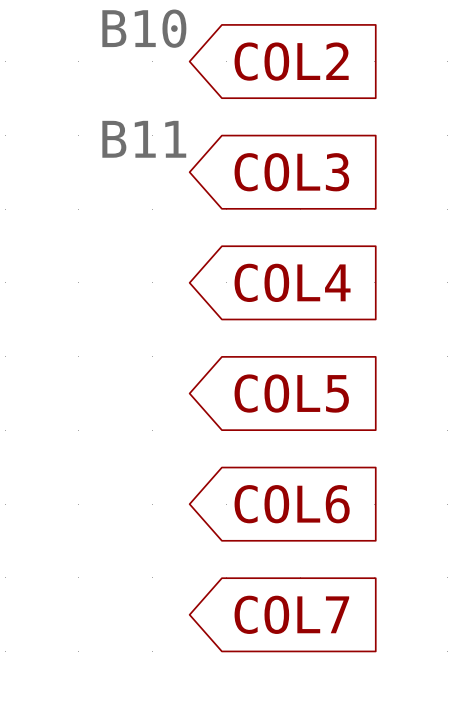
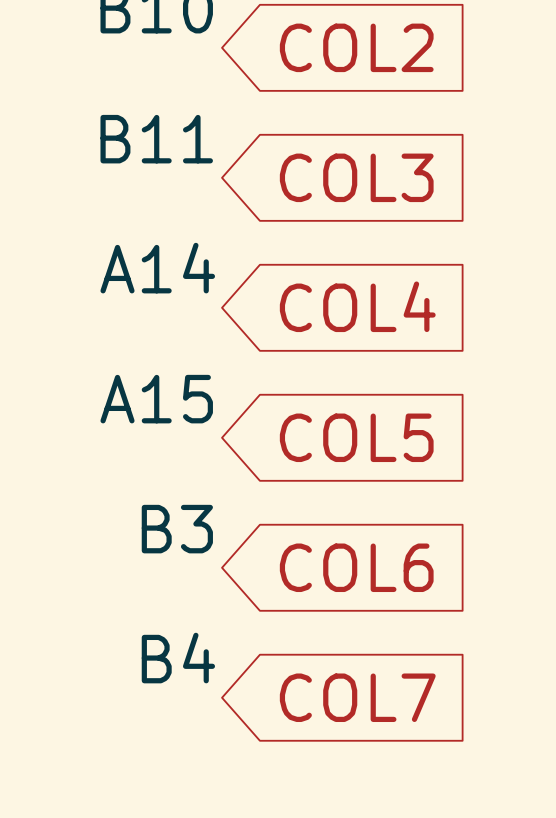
label: none -> A14 (157, 268)
label: none -> A15 (156, 399)
label: none -> B3 (177, 529)
label: none -> B4 (178, 658)

